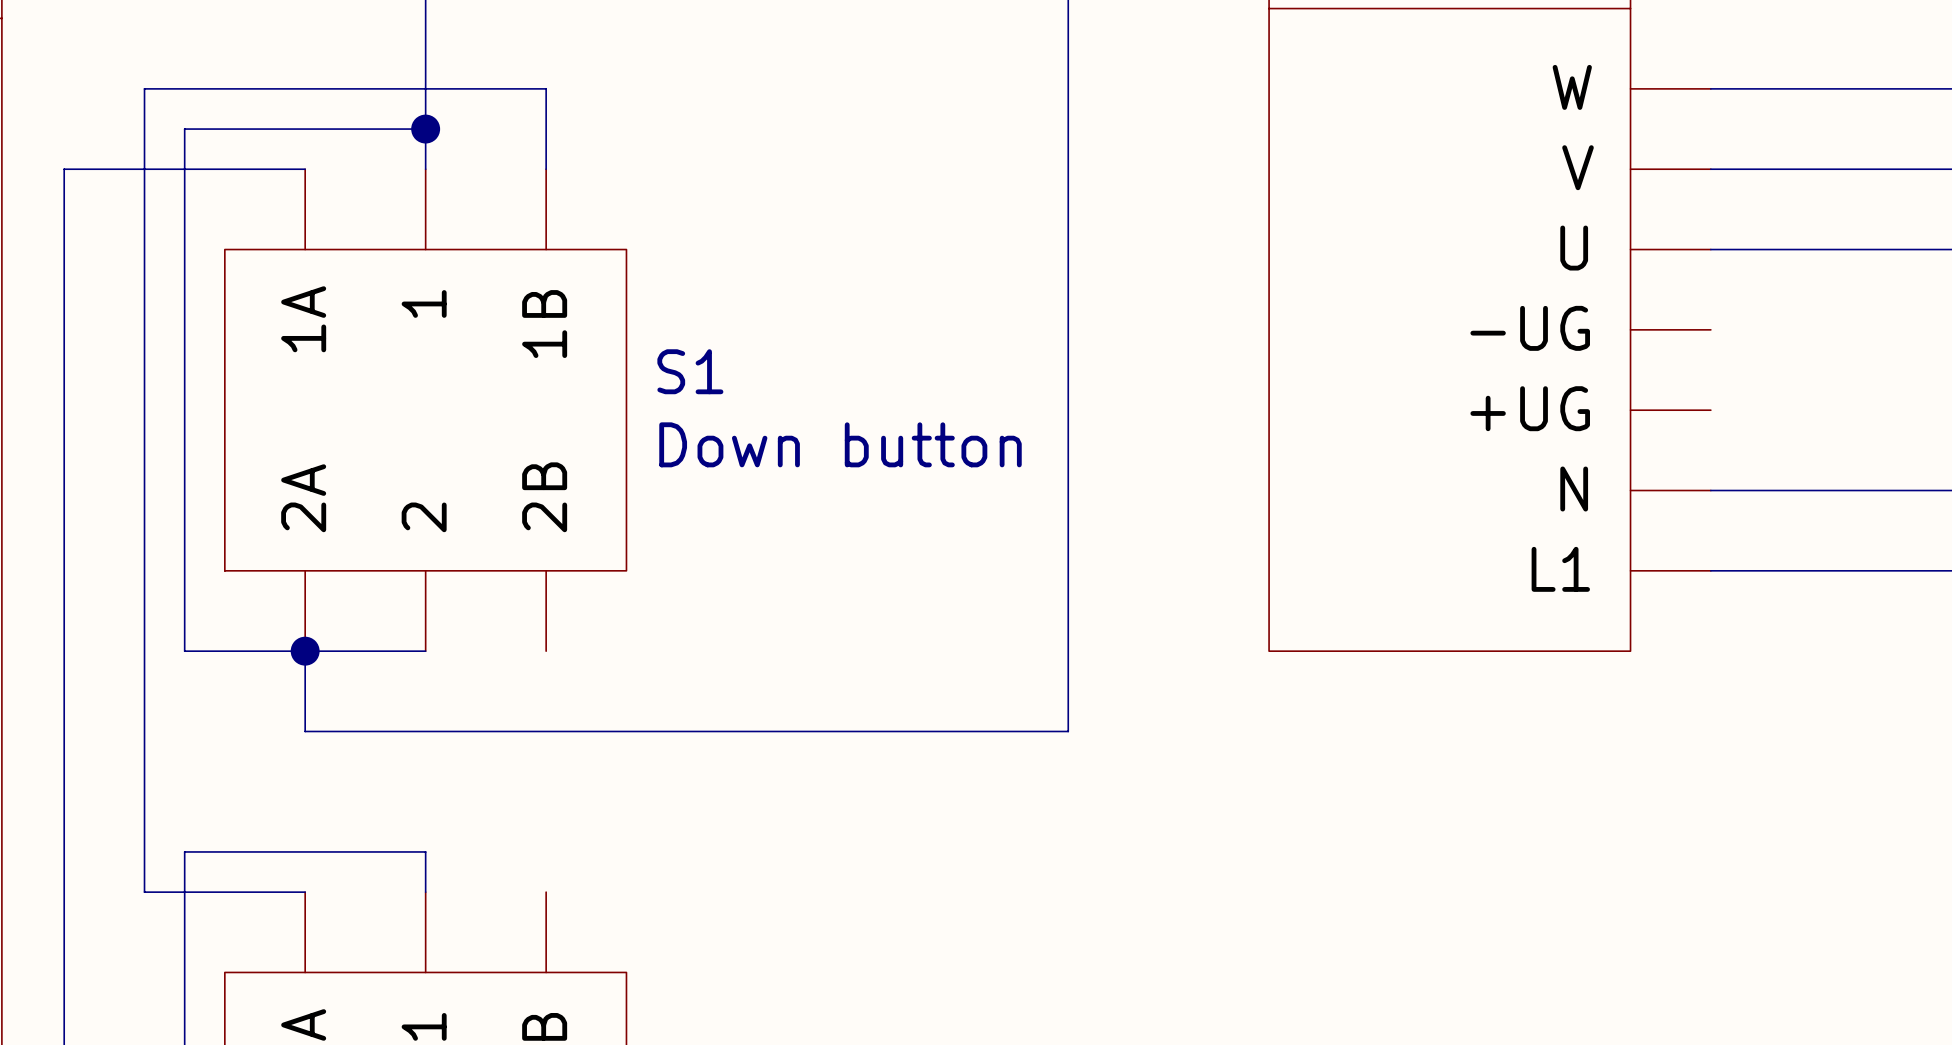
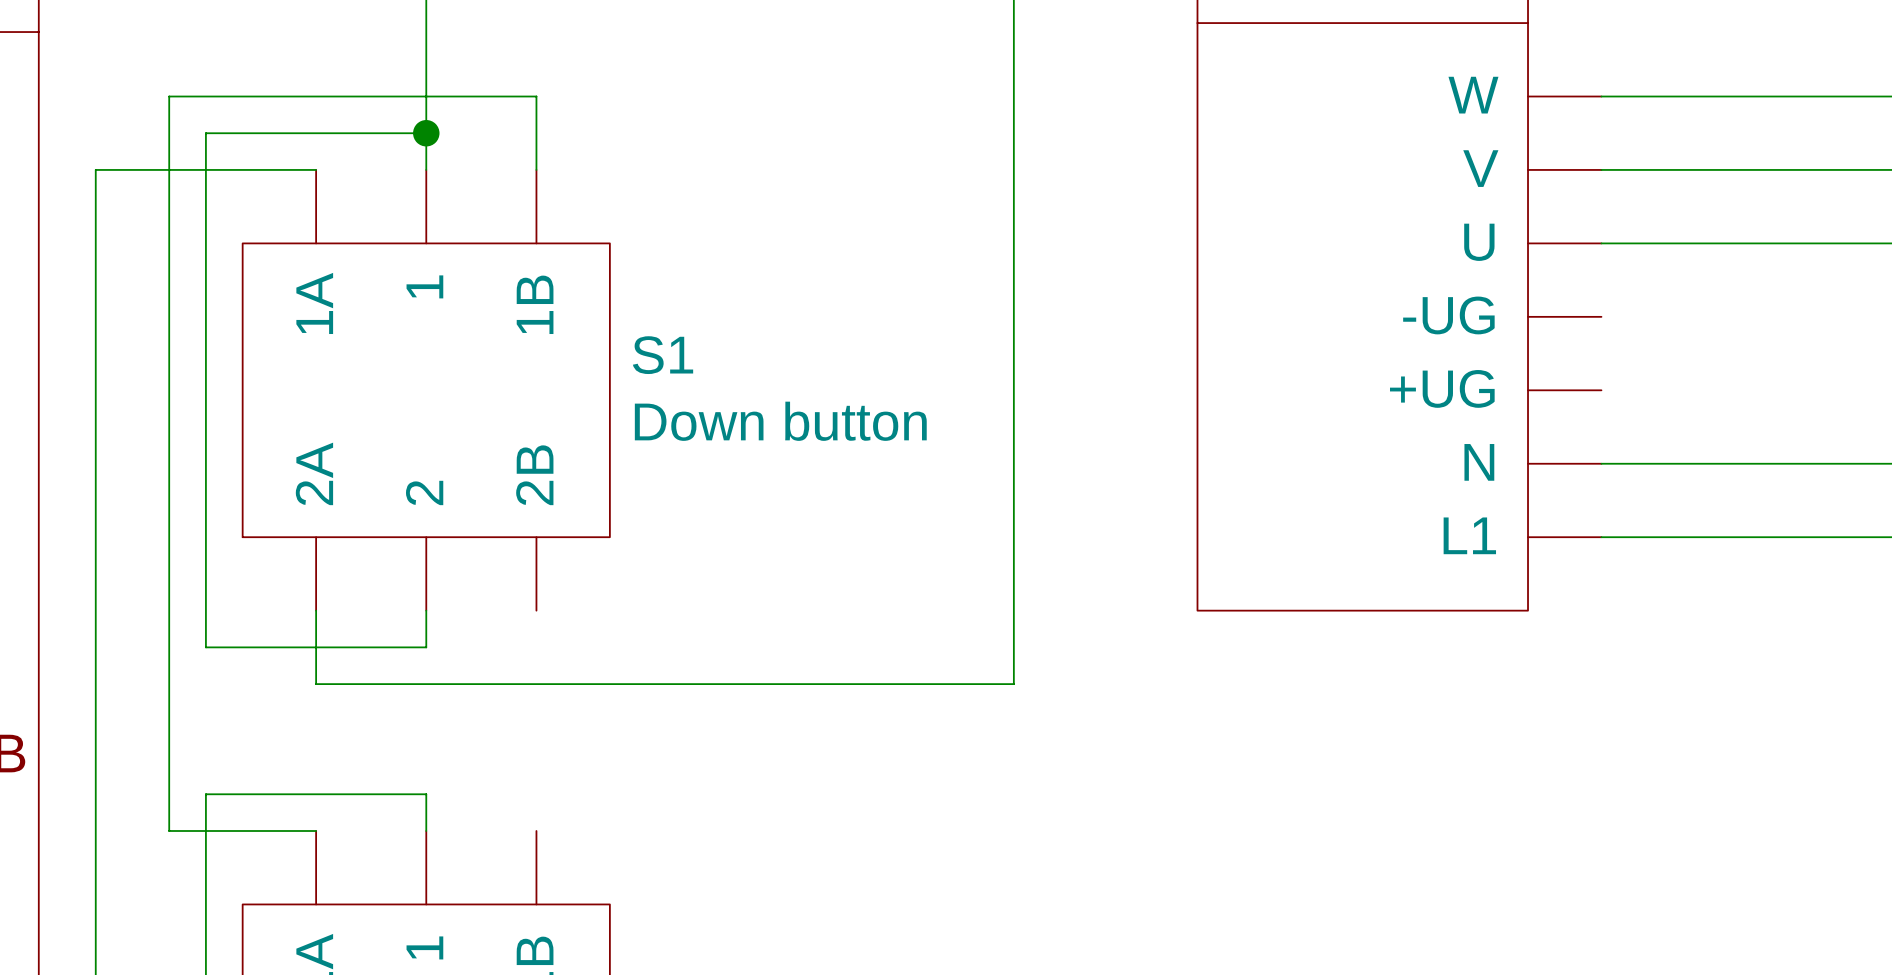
wire: (184, 651) (425, 651) -> (205, 610) (205, 647) (426, 647) (426, 610)
junction: (305, 651) -> none

